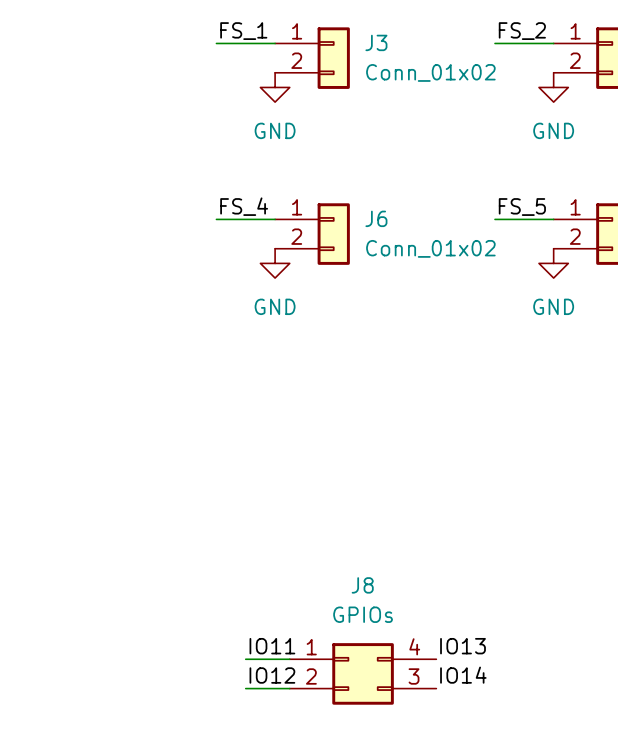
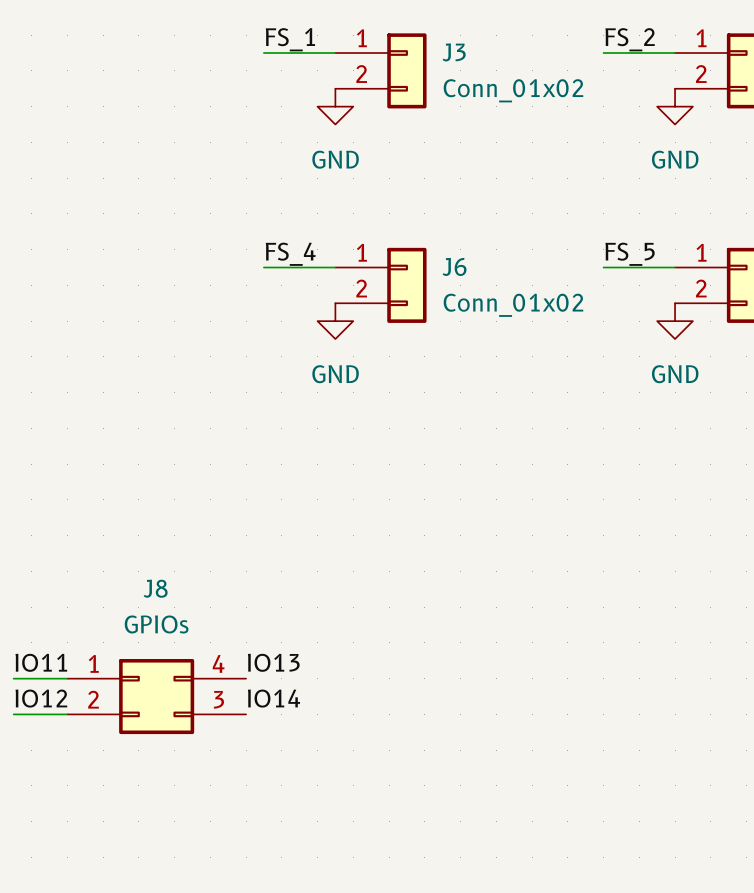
label position: IO11 (272, 646) -> IO11 (41, 662)
label position: IO13 (463, 646) -> IO13 (273, 662)
wire: (245, 659) (289, 659) -> (13, 678) (67, 678)
J8 position: (363, 673) -> (156, 696)
label position: IO12 (272, 675) -> IO12 (41, 698)
label position: IO14 (463, 675) -> IO14 (274, 698)
wire: (245, 688) (289, 688) -> (13, 714) (67, 714)

